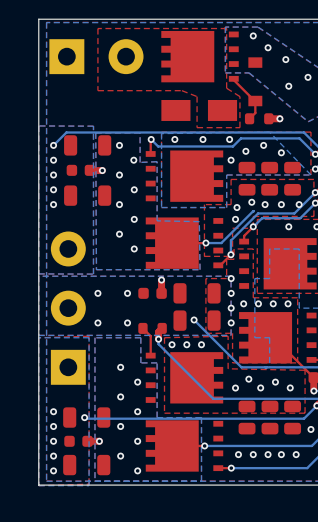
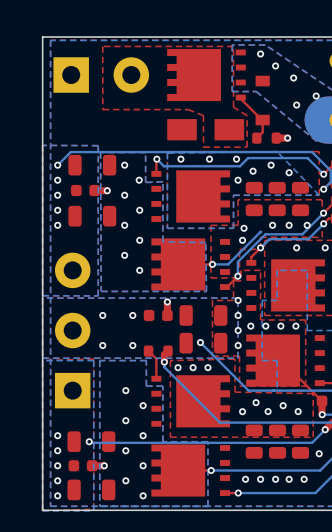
via: (251, 202) -> none

